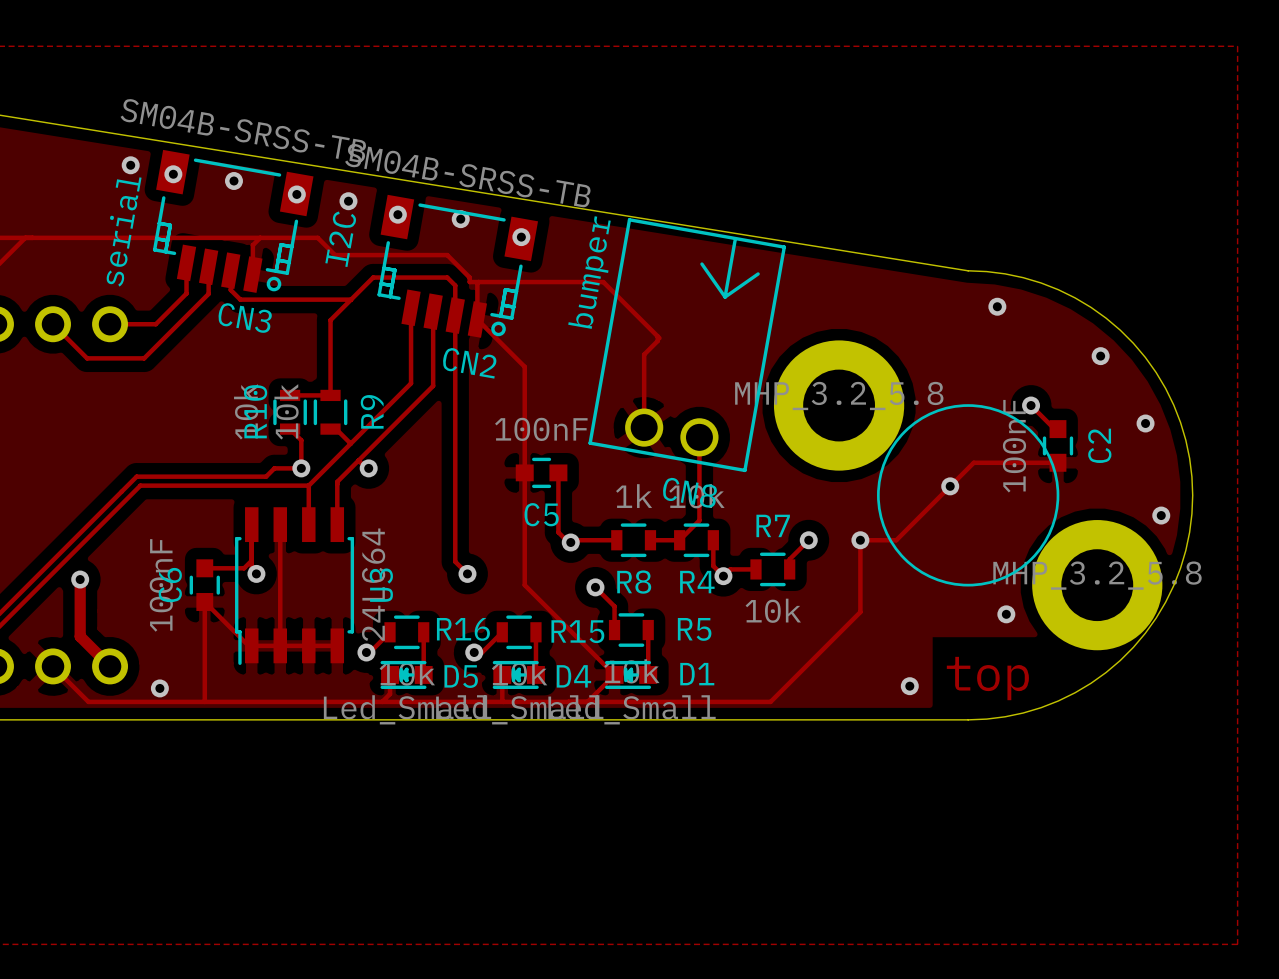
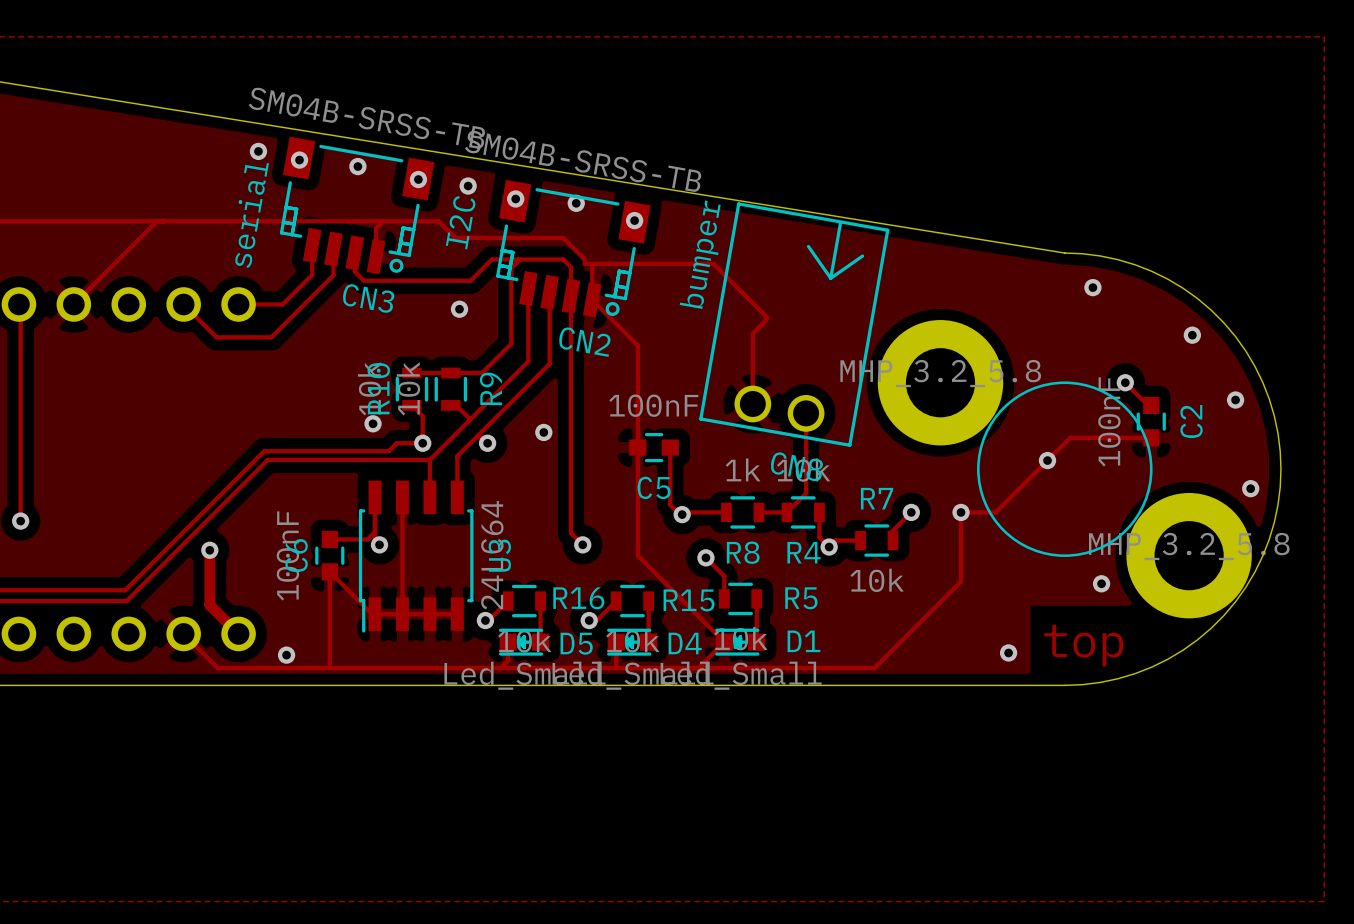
track: (351, 299) (330, 320) (330, 395) -> (520, 259) (511, 268) (511, 343) (482, 373) (450, 373)
via: none -> (459, 309)
via: none -> (373, 423)
via: none -> (543, 432)

